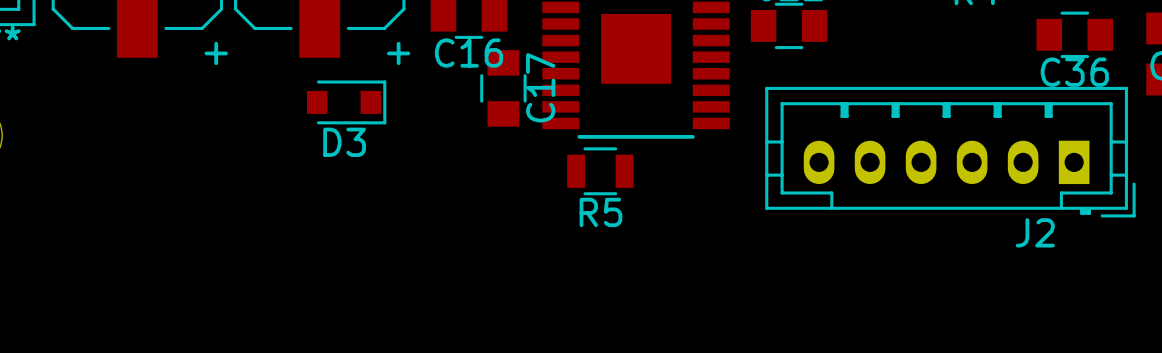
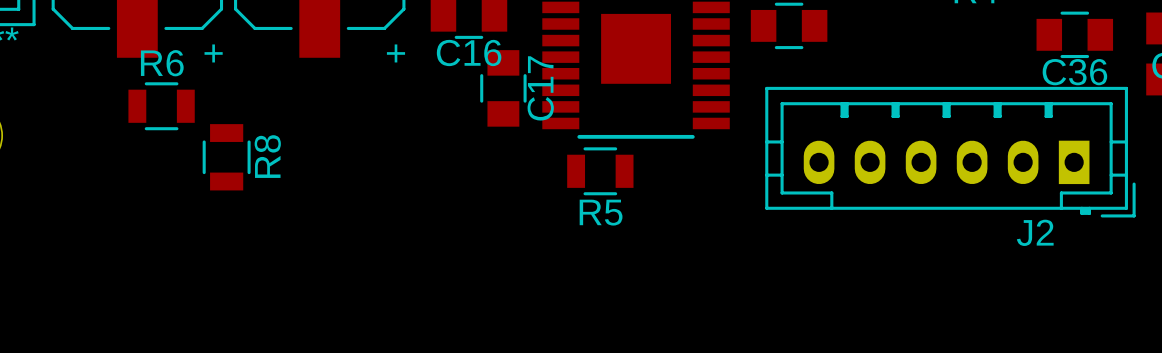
D3: (346, 102) -> none
R6: none -> (161, 106)
R8: none -> (226, 157)

